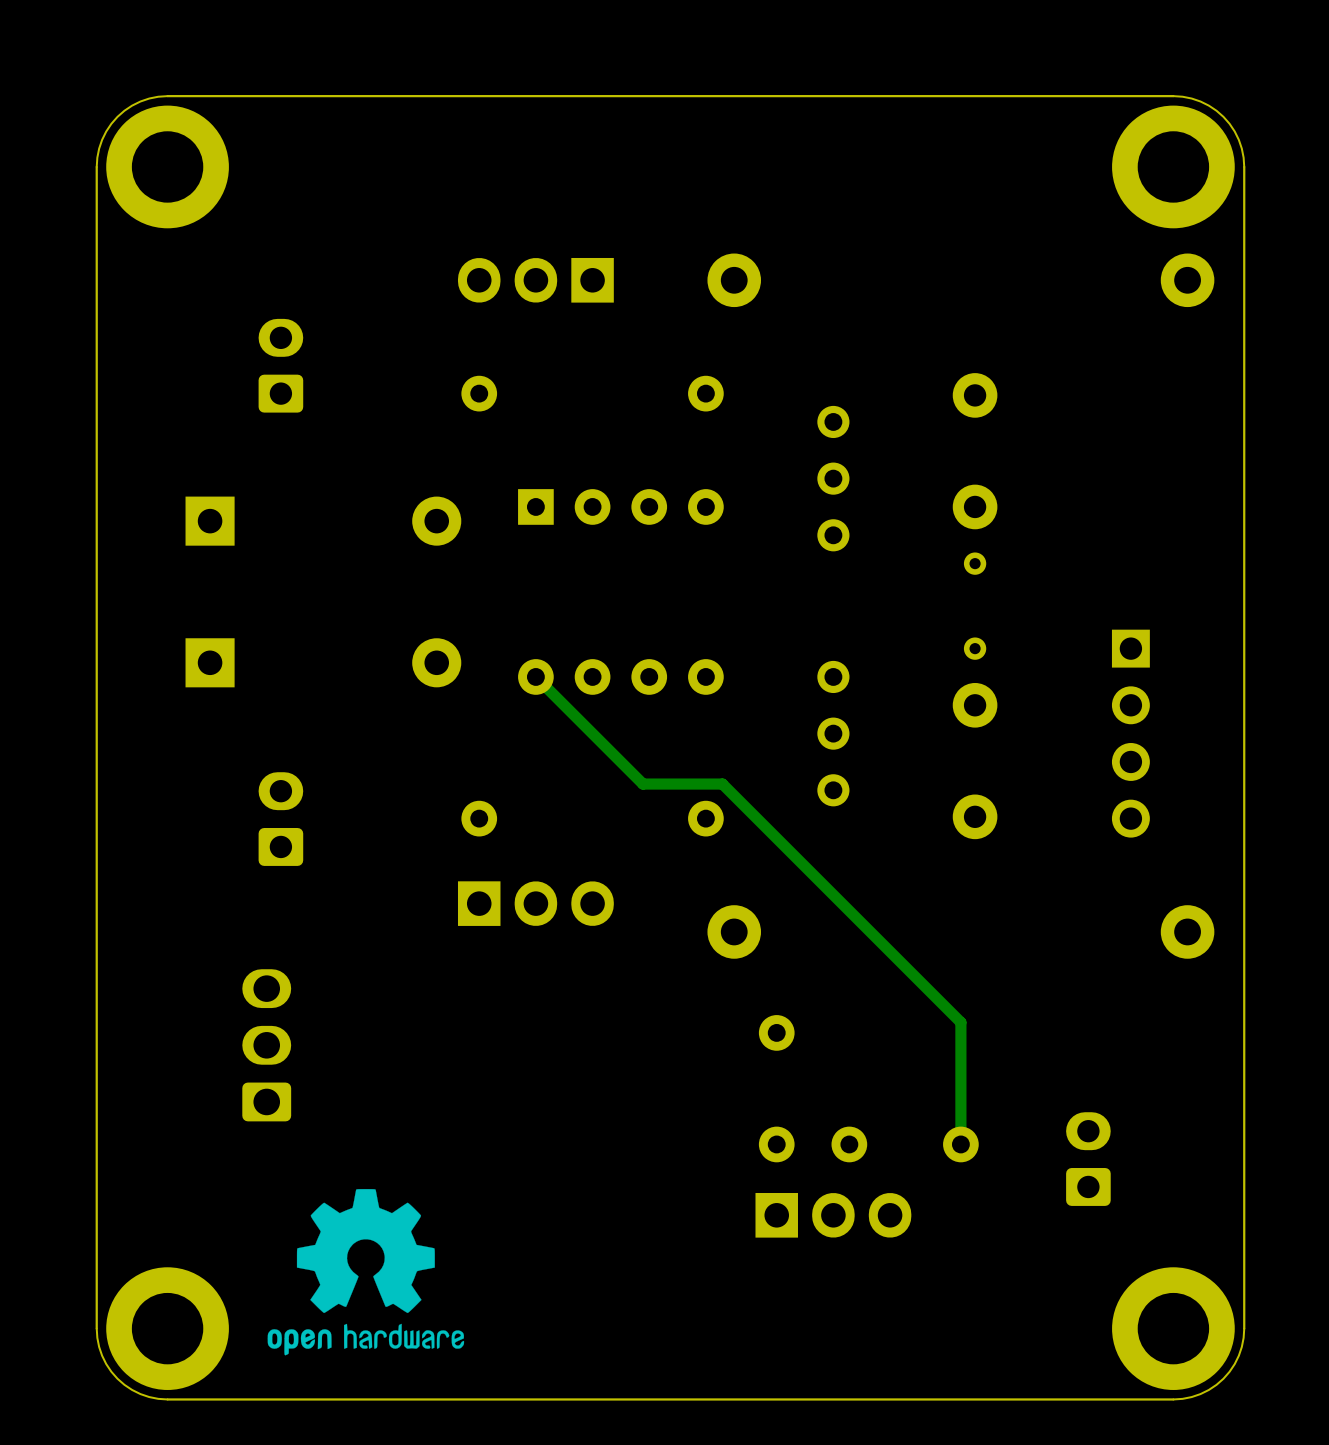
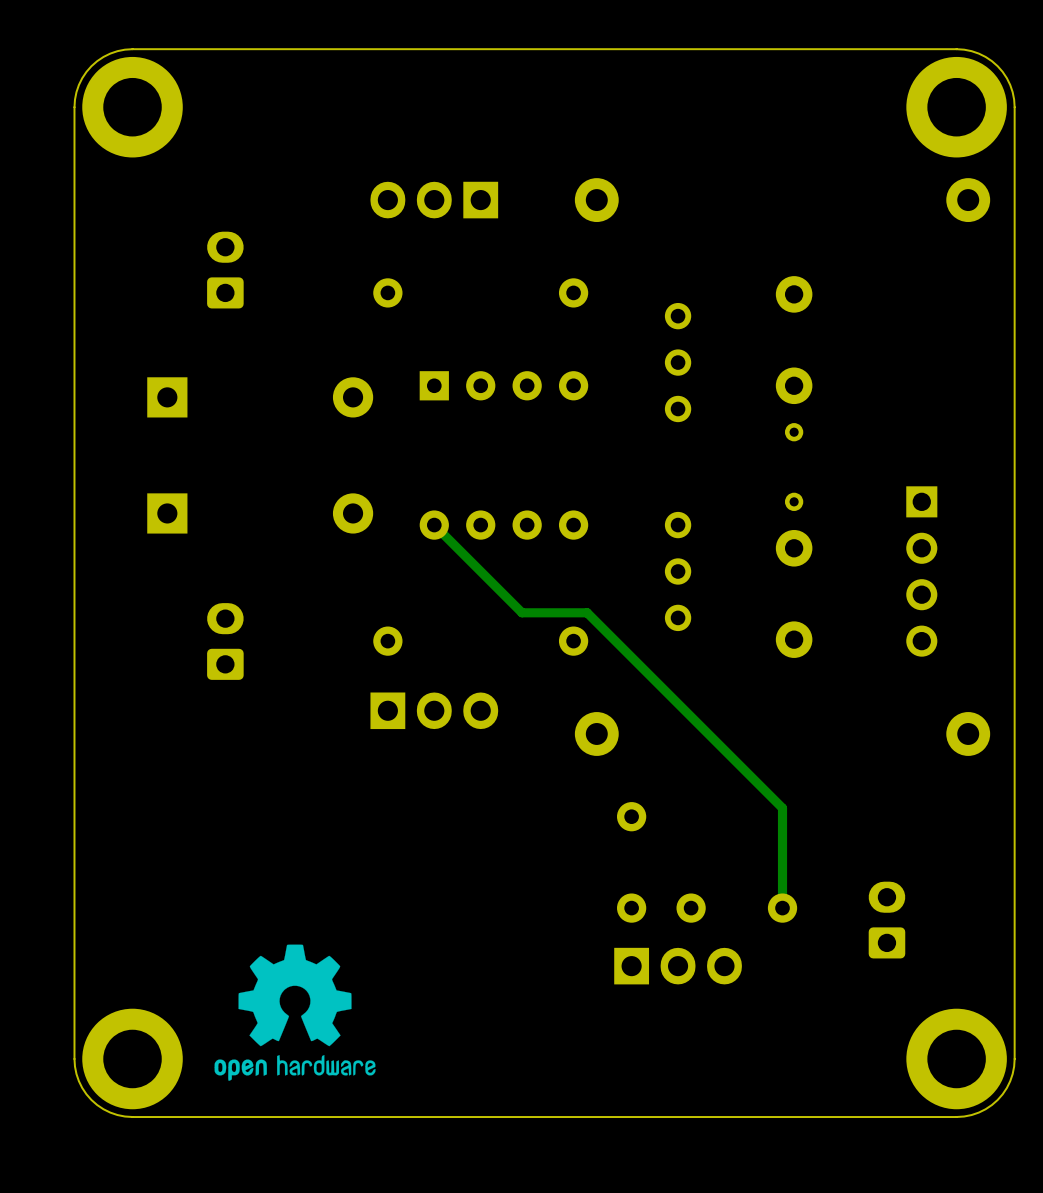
part: (266, 1045) -> none

